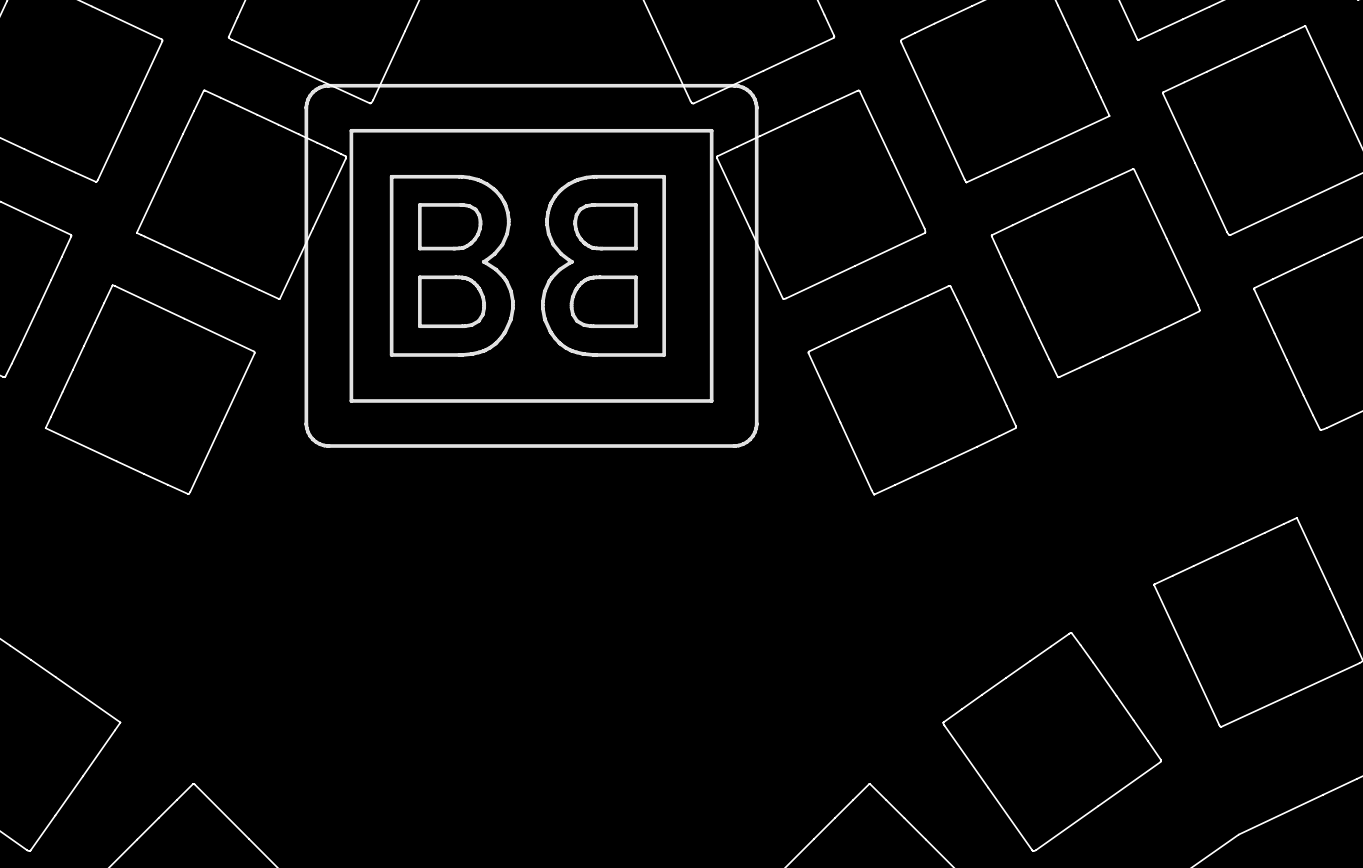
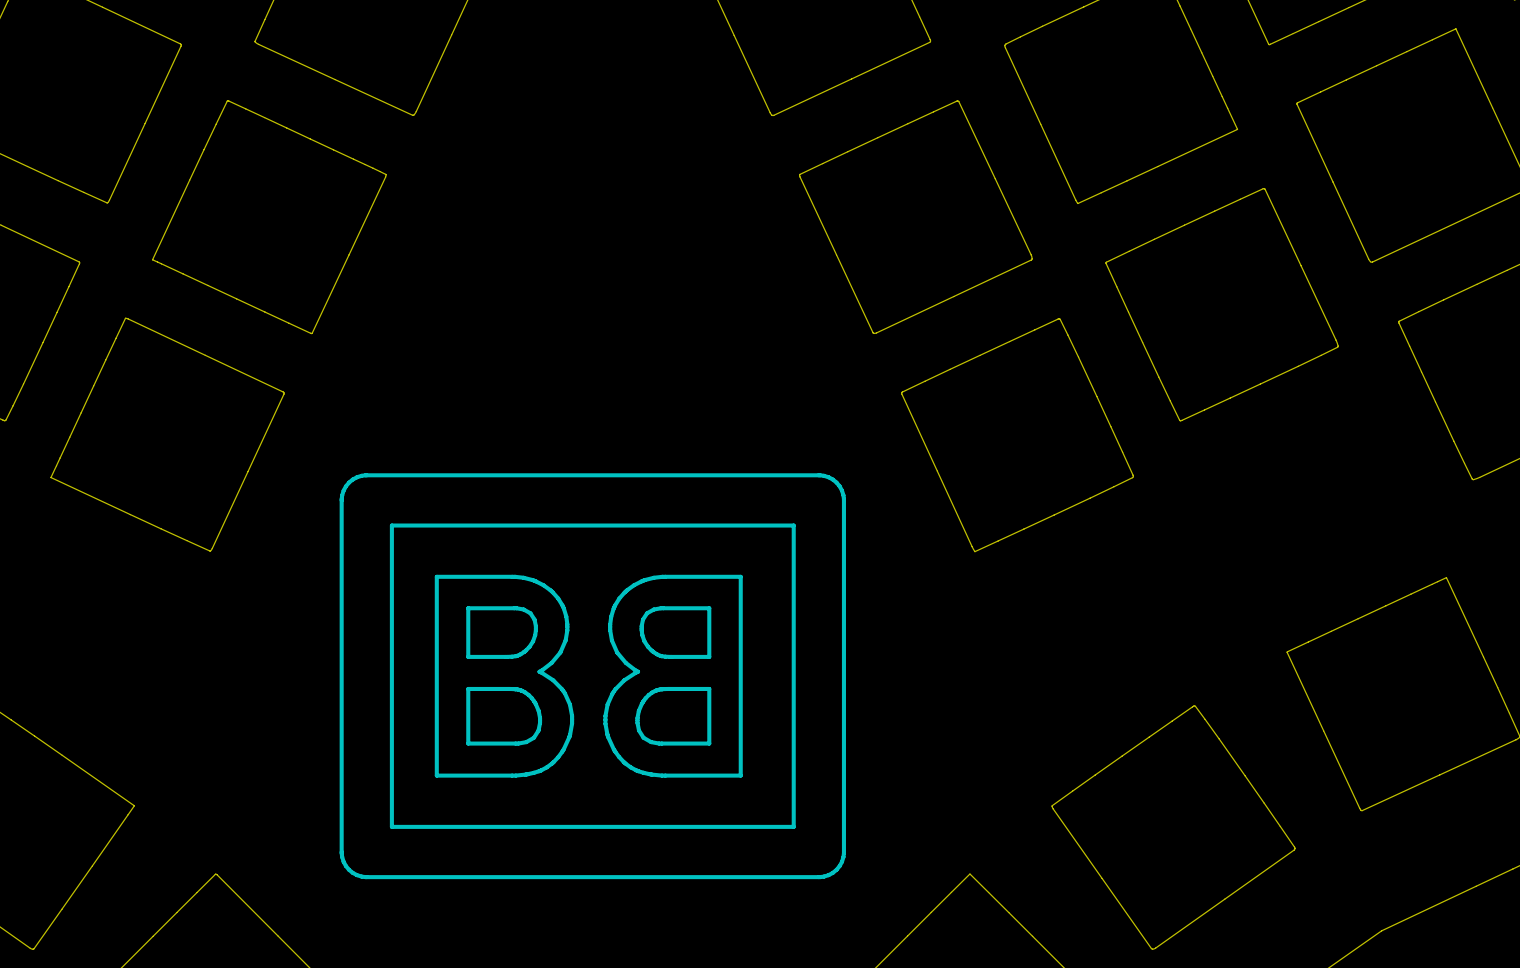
line: (735, 85) (327, 85) (312, 92) (306, 107) (306, 424) (312, 439) (327, 446) (735, 446) (750, 439) (756, 424) (756, 107) (750, 92) (735, 85) -> none
line: (711, 130) (711, 400) (351, 400) (351, 130) (711, 130) -> none
line: (461, 176) (391, 176) (391, 354) (462, 354) (478, 352) (496, 342) (505, 331) (510, 320) (512, 301) (506, 281) (496, 269) (483, 261) (494, 253) (502, 244) (507, 233) (508, 219) (505, 205) (500, 196) (487, 184) (477, 179) (461, 176) -> none
line: (664, 176) (586, 177) (568, 184) (560, 190) (551, 202) (547, 219) (548, 233) (553, 244) (561, 253) (572, 261) (559, 269) (549, 281) (544, 291) (542, 308) (550, 331) (565, 347) (576, 352) (593, 354) (664, 354) (664, 176) -> none
line: (463, 204) (419, 204) (419, 248) (459, 248) (471, 242) (479, 229) (479, 215) (475, 209) (463, 204) -> none
line: (635, 204) (586, 206) (580, 209) (576, 215) (575, 224) (577, 234) (584, 242) (592, 247) (635, 248) (635, 204) -> none
line: (456, 277) (419, 277) (419, 326) (464, 326) (478, 321) (484, 307) (480, 290) (470, 280) (456, 277) -> none
line: (635, 277) (635, 326) (591, 326) (577, 321) (572, 314) (571, 303) (575, 290) (581, 282) (593, 277) (635, 277) -> none
line: none -> (820, 475) (365, 475) (356, 477) (349, 482) (343, 490) (341, 499) (341, 853) (343, 861) (349, 869) (356, 875) (365, 877) (820, 877) (828, 875) (836, 869) (841, 861) (843, 853) (843, 499) (841, 490) (836, 482) (828, 477) (820, 475)
line: none -> (793, 525) (793, 826) (391, 826) (391, 525) (793, 525)
line: none -> (515, 576) (436, 576) (436, 775) (515, 775) (534, 772) (553, 761) (563, 749) (569, 737) (572, 716) (564, 693) (553, 680) (539, 671) (551, 662) (560, 652) (565, 640) (567, 624) (563, 608) (558, 598) (543, 585) (532, 580) (515, 576)
line: none -> (740, 576) (653, 577) (634, 585) (624, 592) (615, 605) (610, 624) (611, 640) (617, 652) (625, 662) (638, 671) (624, 680) (612, 693) (607, 704) (605, 723) (608, 737) (613, 749) (630, 767) (643, 772) (662, 775) (740, 775) (740, 576)
line: none -> (516, 608) (468, 608) (468, 656) (512, 656) (525, 650) (535, 635) (534, 619) (530, 613) (516, 608)
line: none -> (709, 608) (653, 609) (647, 613) (643, 619) (641, 630) (644, 641) (651, 650) (660, 656) (709, 656) (709, 608)
line: none -> (509, 688) (468, 688) (468, 743) (518, 743) (533, 737) (540, 722) (535, 703) (525, 692) (509, 688)
line: none -> (709, 688) (709, 743) (659, 743) (643, 737) (639, 730) (637, 718) (641, 703) (648, 695) (661, 689) (709, 688)

